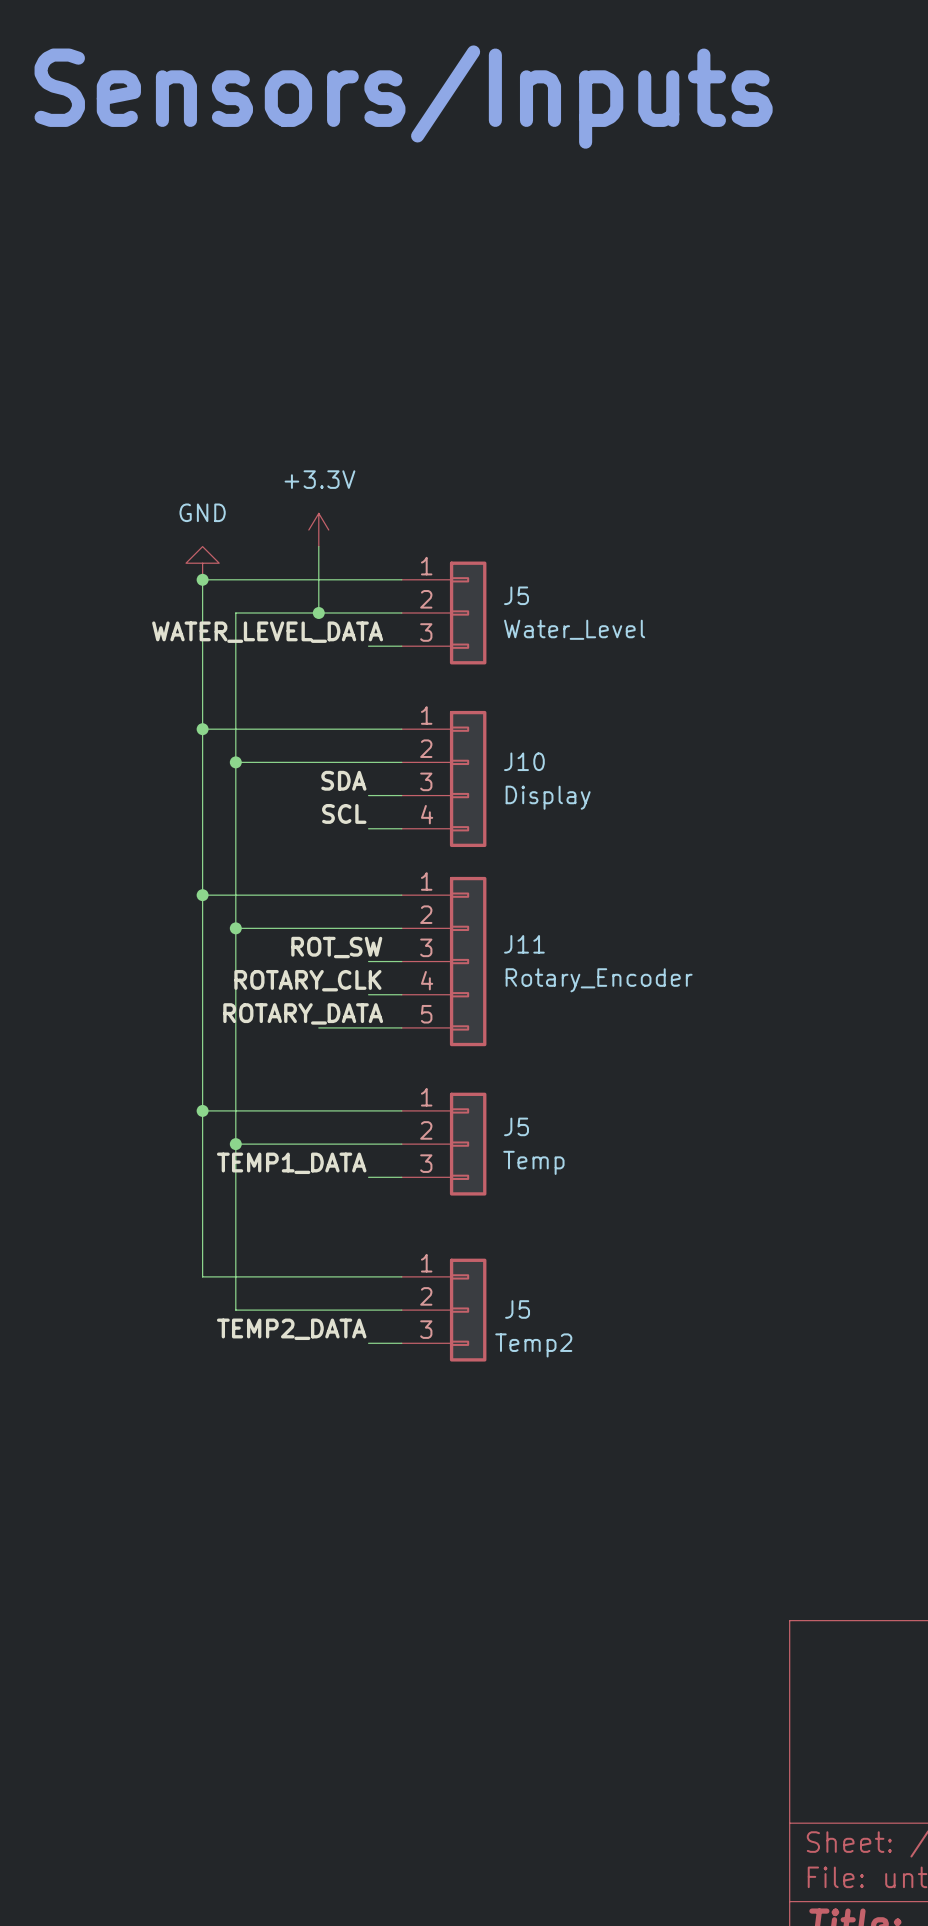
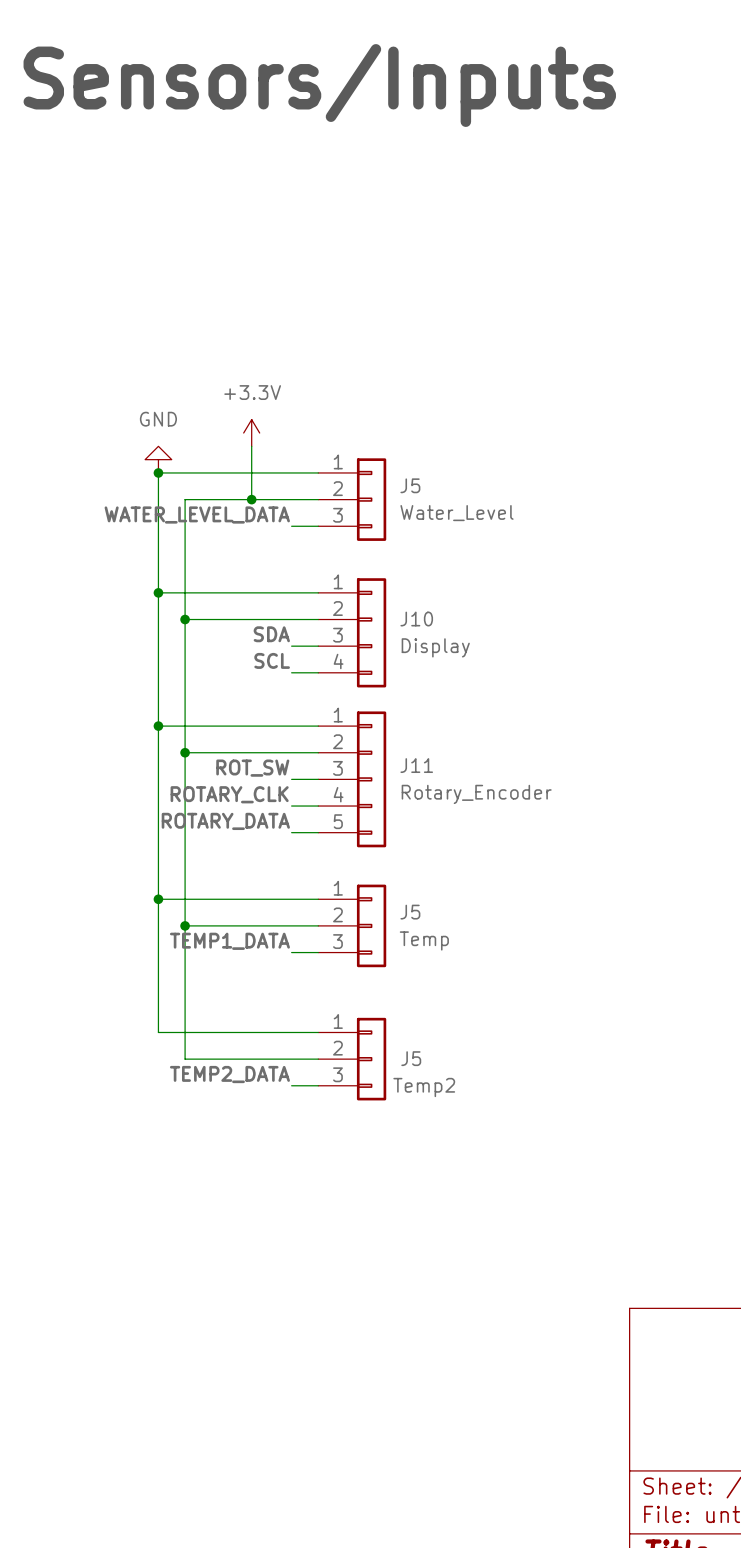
label position: WATER_LEVEL_DATA (267, 632) -> WATER_LEVEL_DATA (197, 515)
label position: ROT_SW (336, 947) -> ROT_SW (252, 768)
label position: ROTARY_CLK (307, 980) -> ROTARY_CLK (229, 794)
label position: ROTARY_DATA (303, 1013) -> ROTARY_DATA (225, 821)
wire: (318, 1027) (368, 1027) -> none

